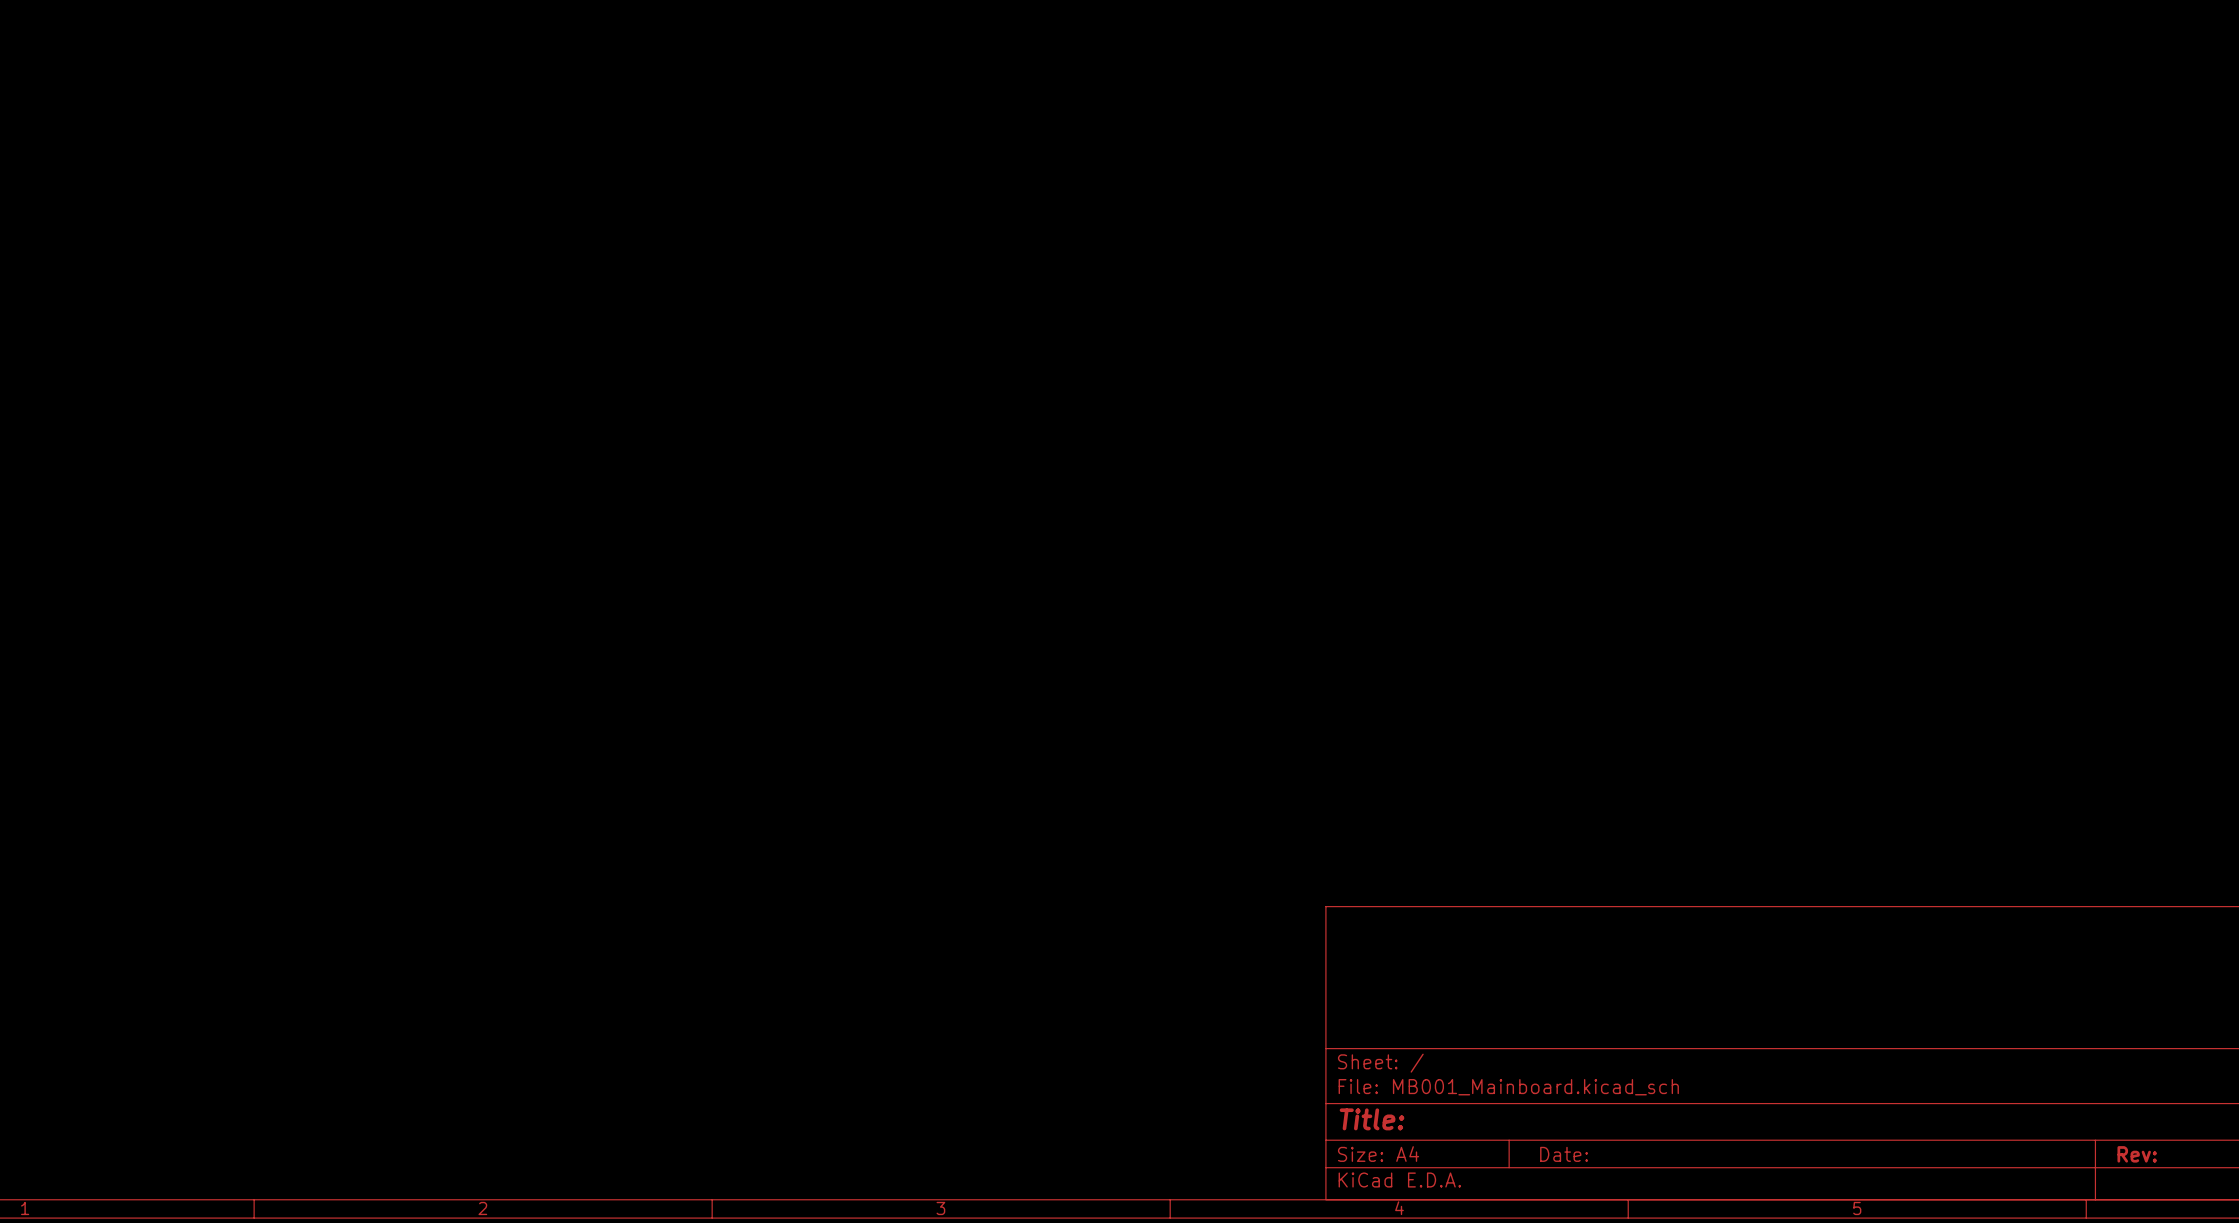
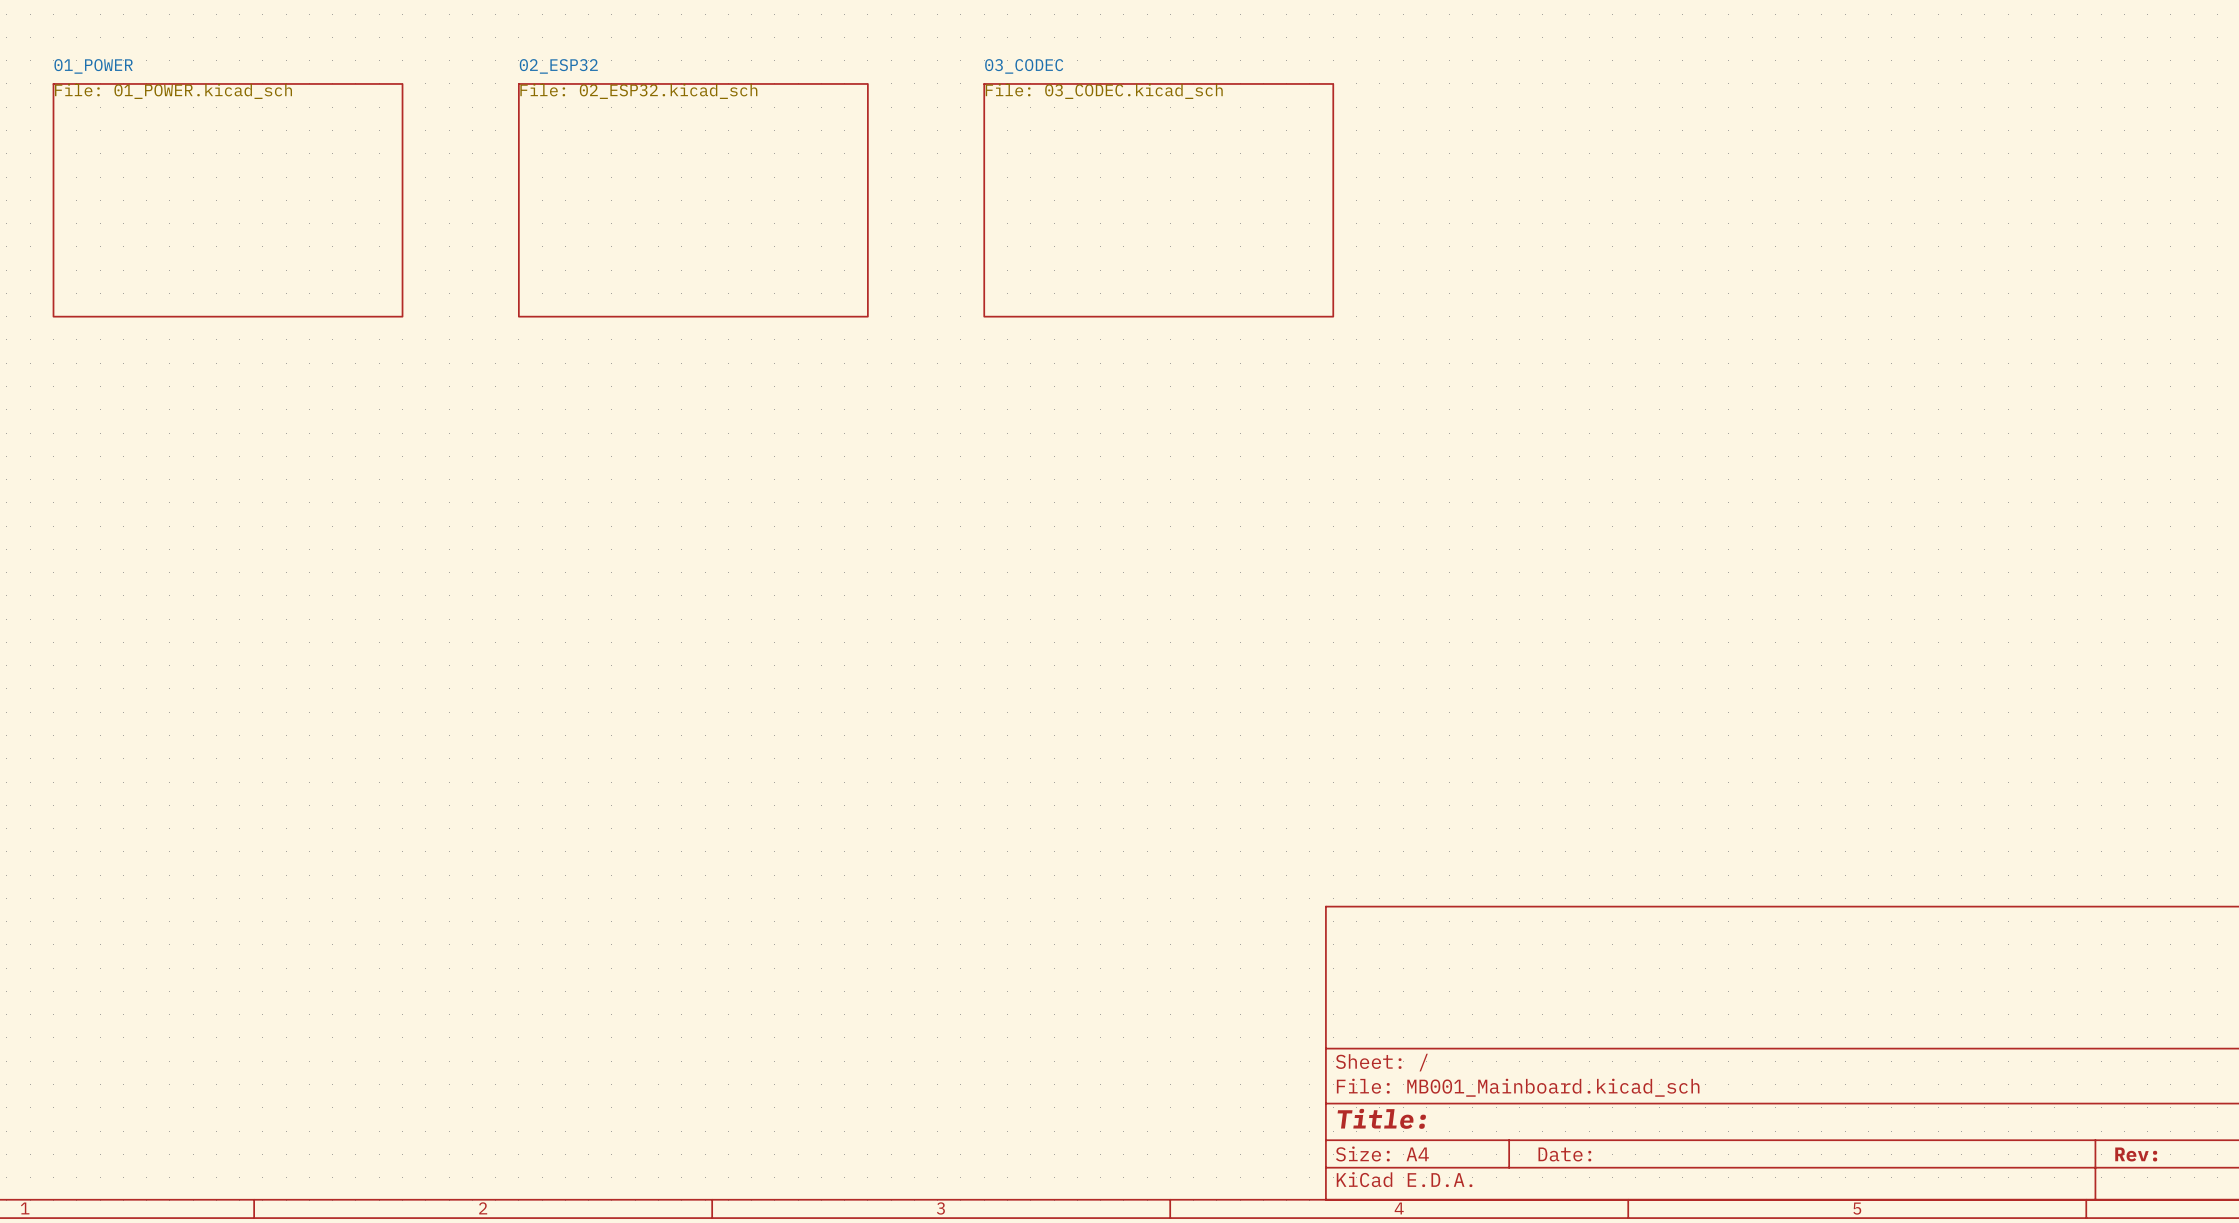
sheet 01_POWER: none -> File: 01_POWER.kicad_sch (228, 200)
sheet 02_ESP32: none -> File: 02_ESP32.kicad_sch (693, 200)
sheet 03_CODEC: none -> File: 03_CODEC.kicad_sch (1158, 200)

